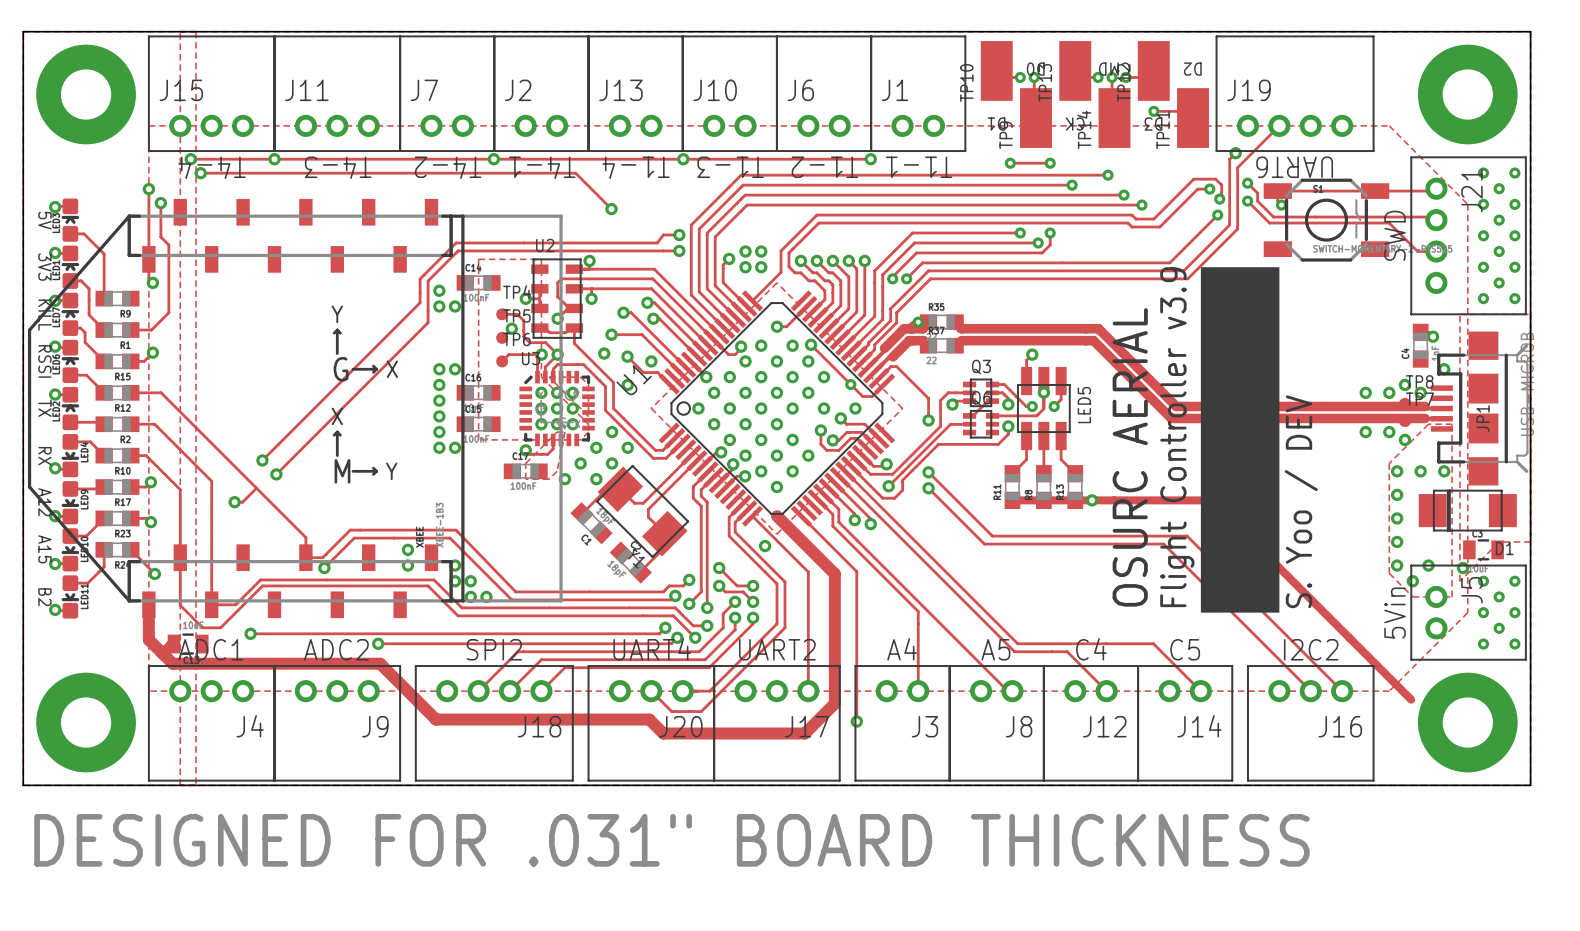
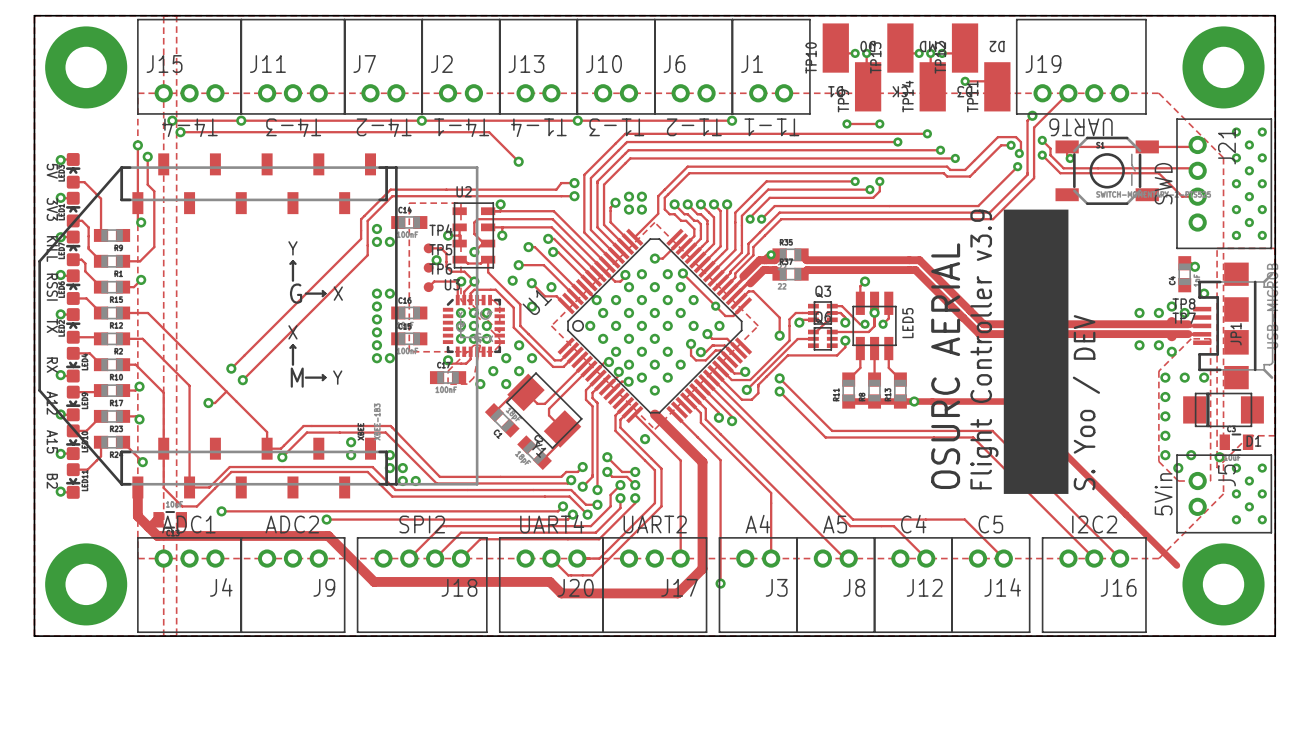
text: DESIGNED FOR .031" BOARD THICKNESS (671, 840) -> none

